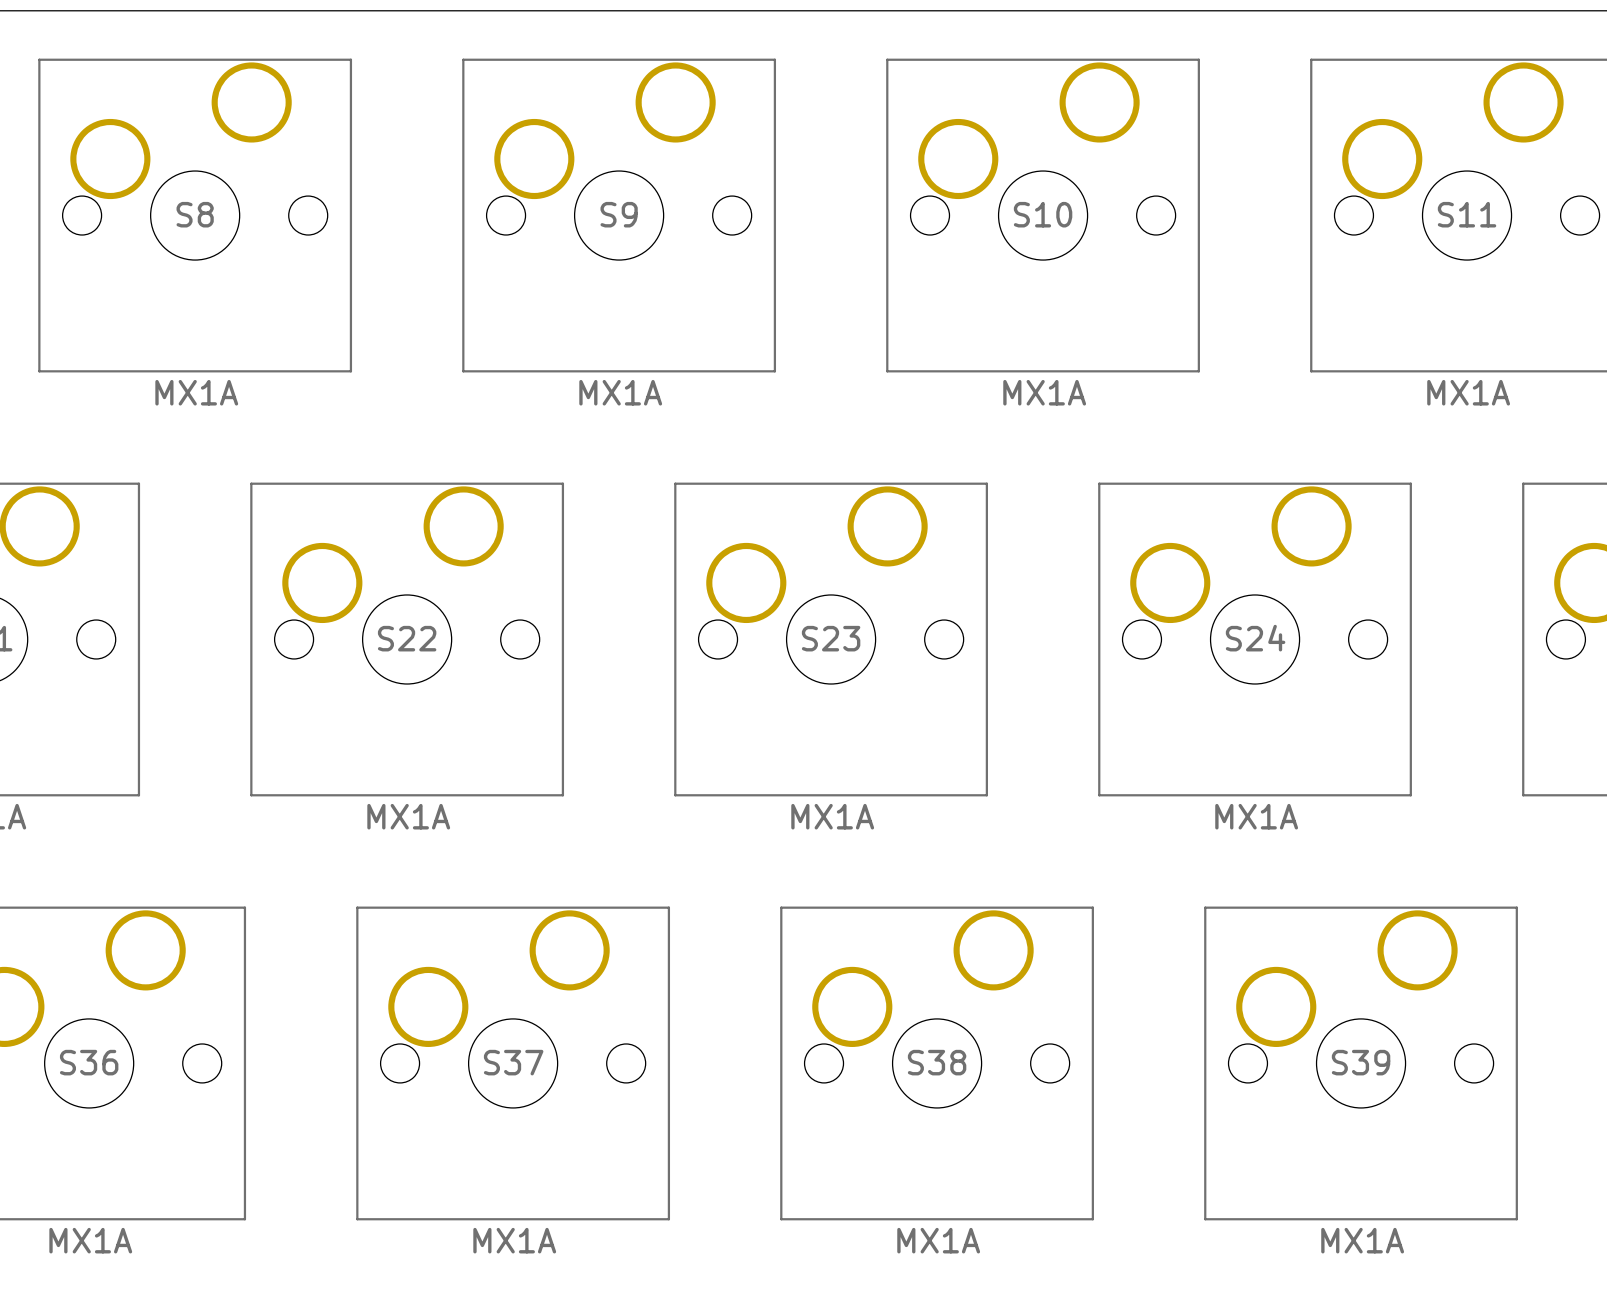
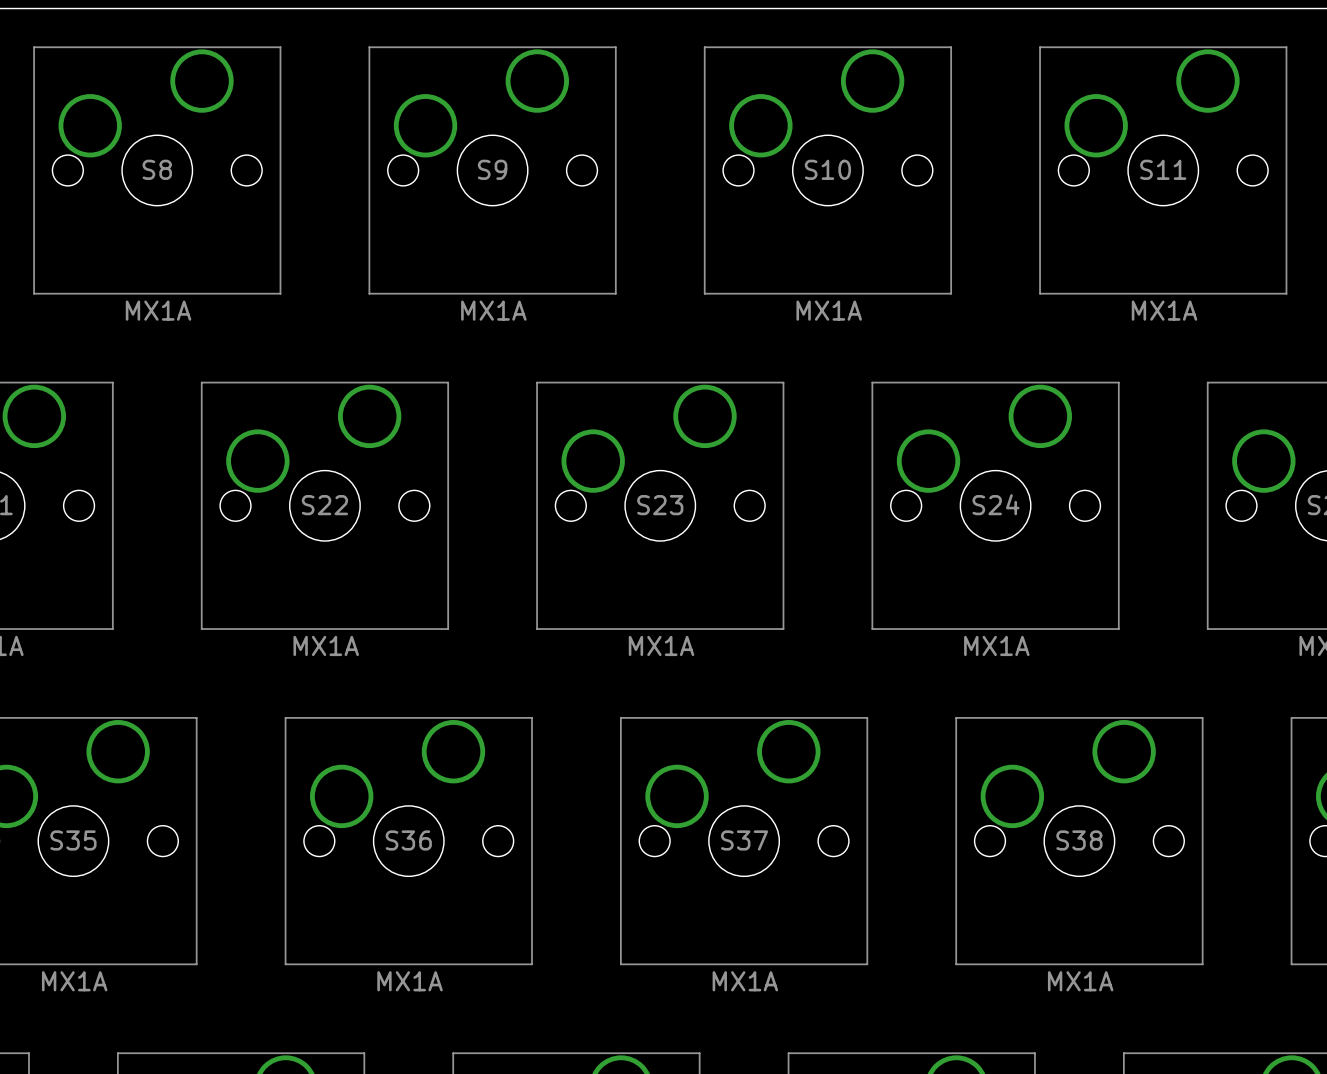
S36 name: S36 (89, 1062) -> S35 (73, 840)
S37 name: S37 (513, 1062) -> S36 (408, 840)
S38 name: S38 (937, 1062) -> S37 (744, 840)
S39 name: S39 (1361, 1062) -> S38 (1079, 840)

